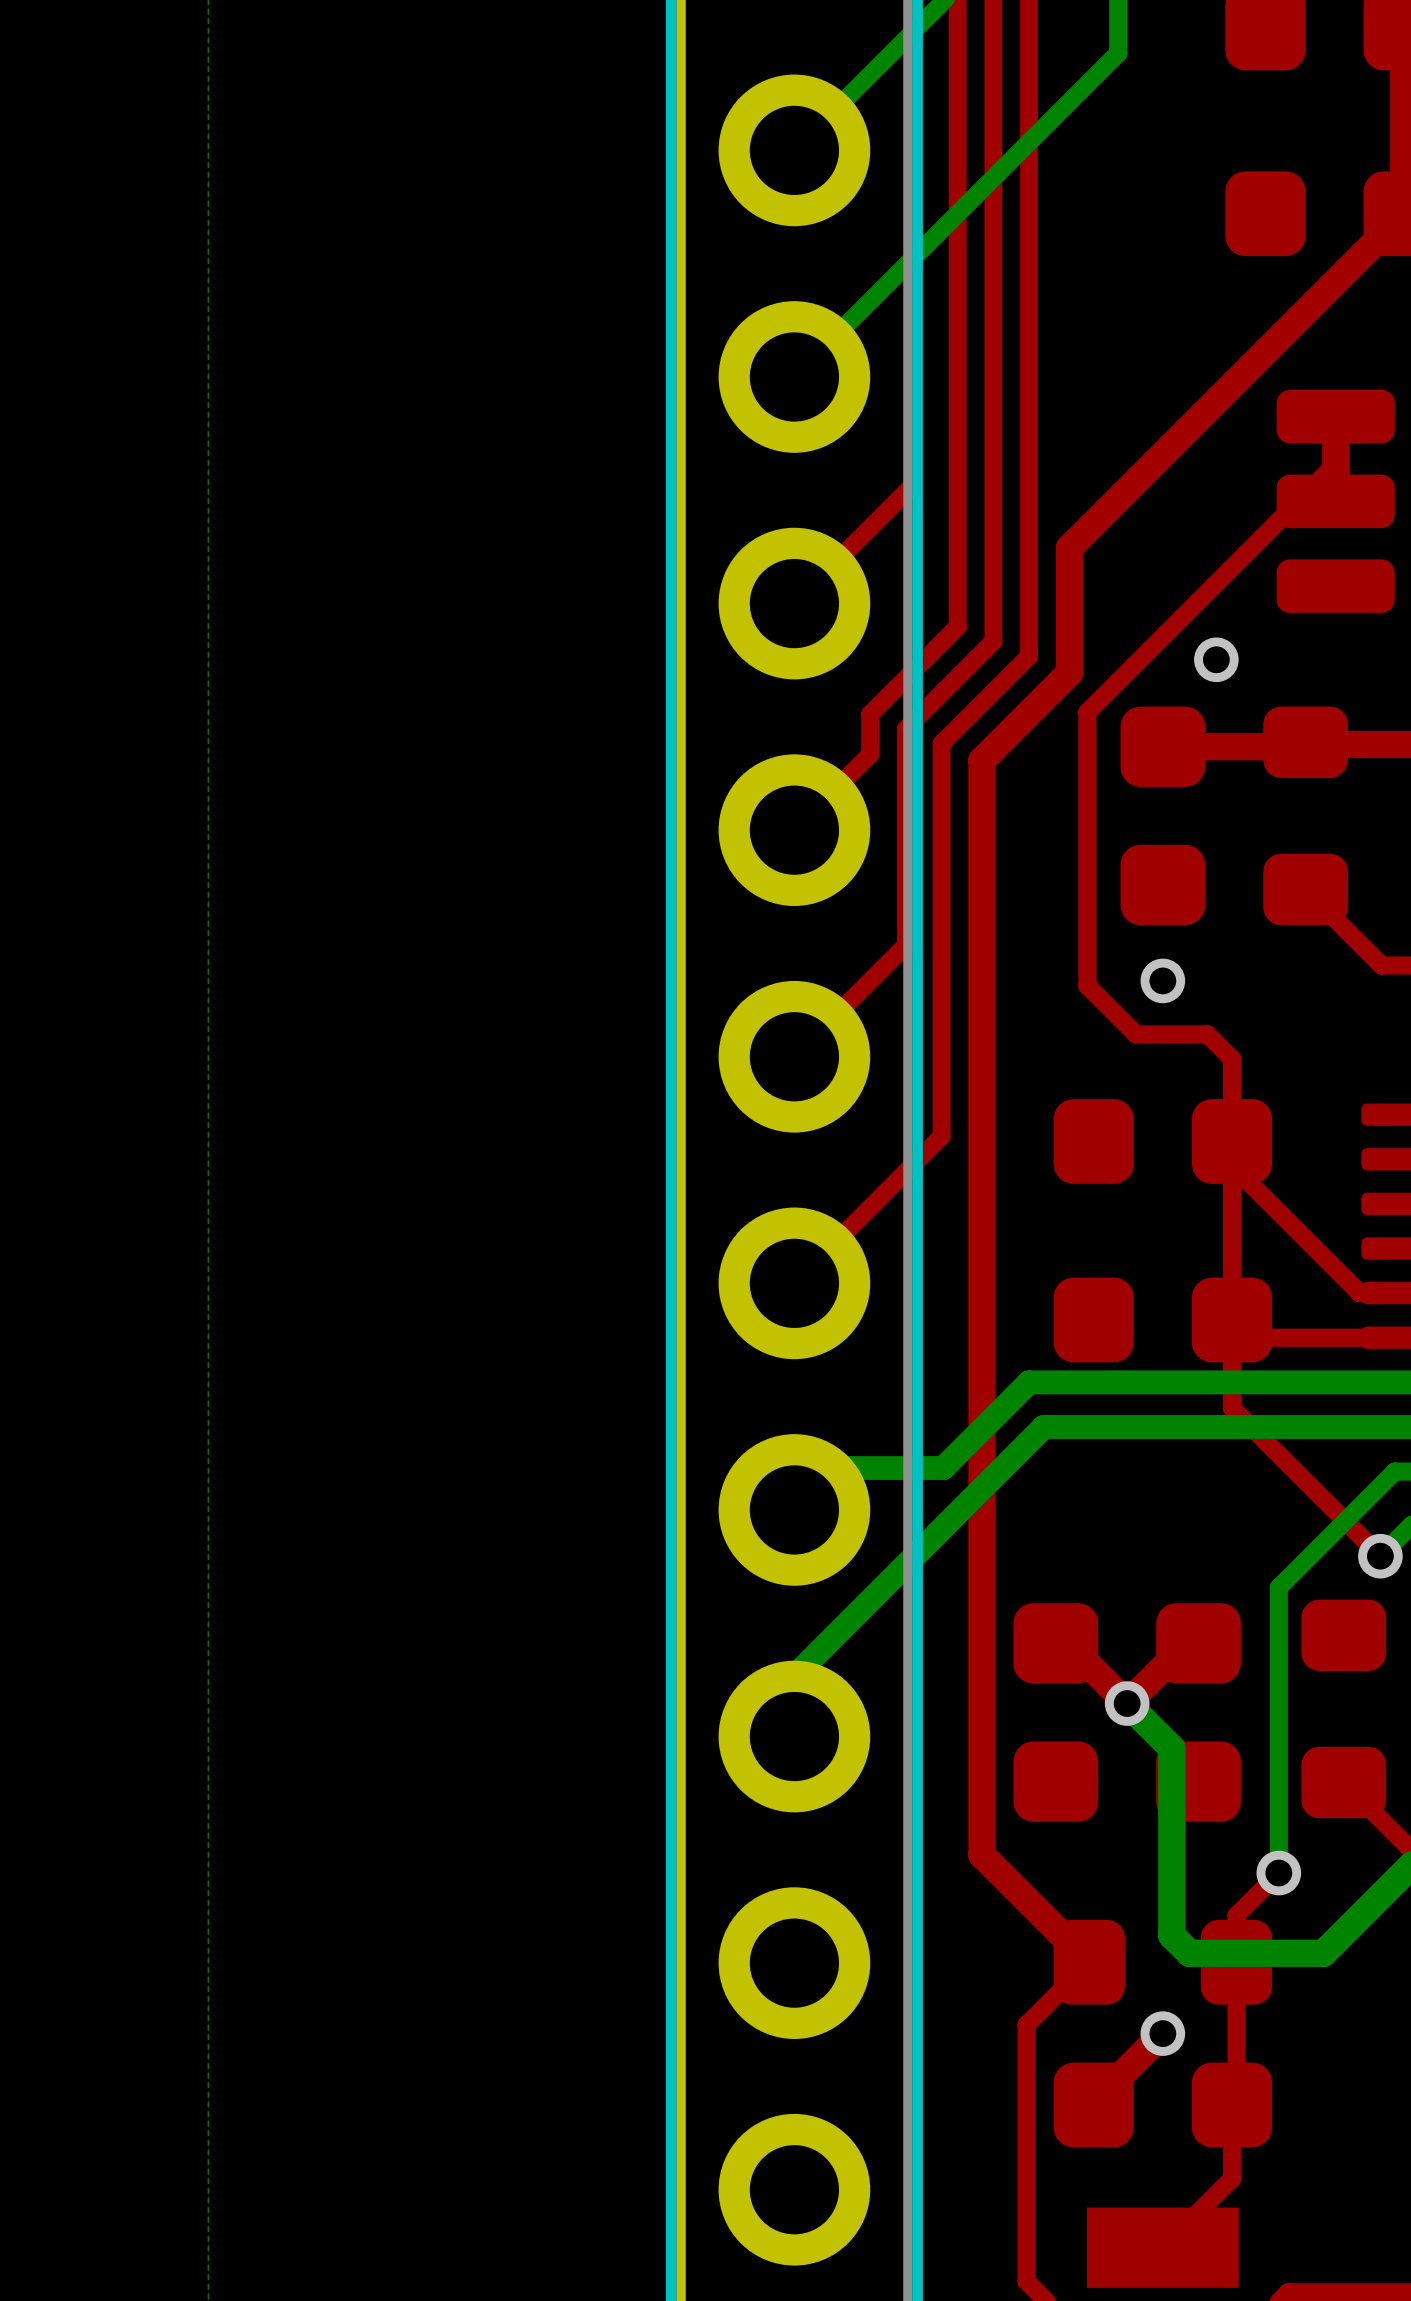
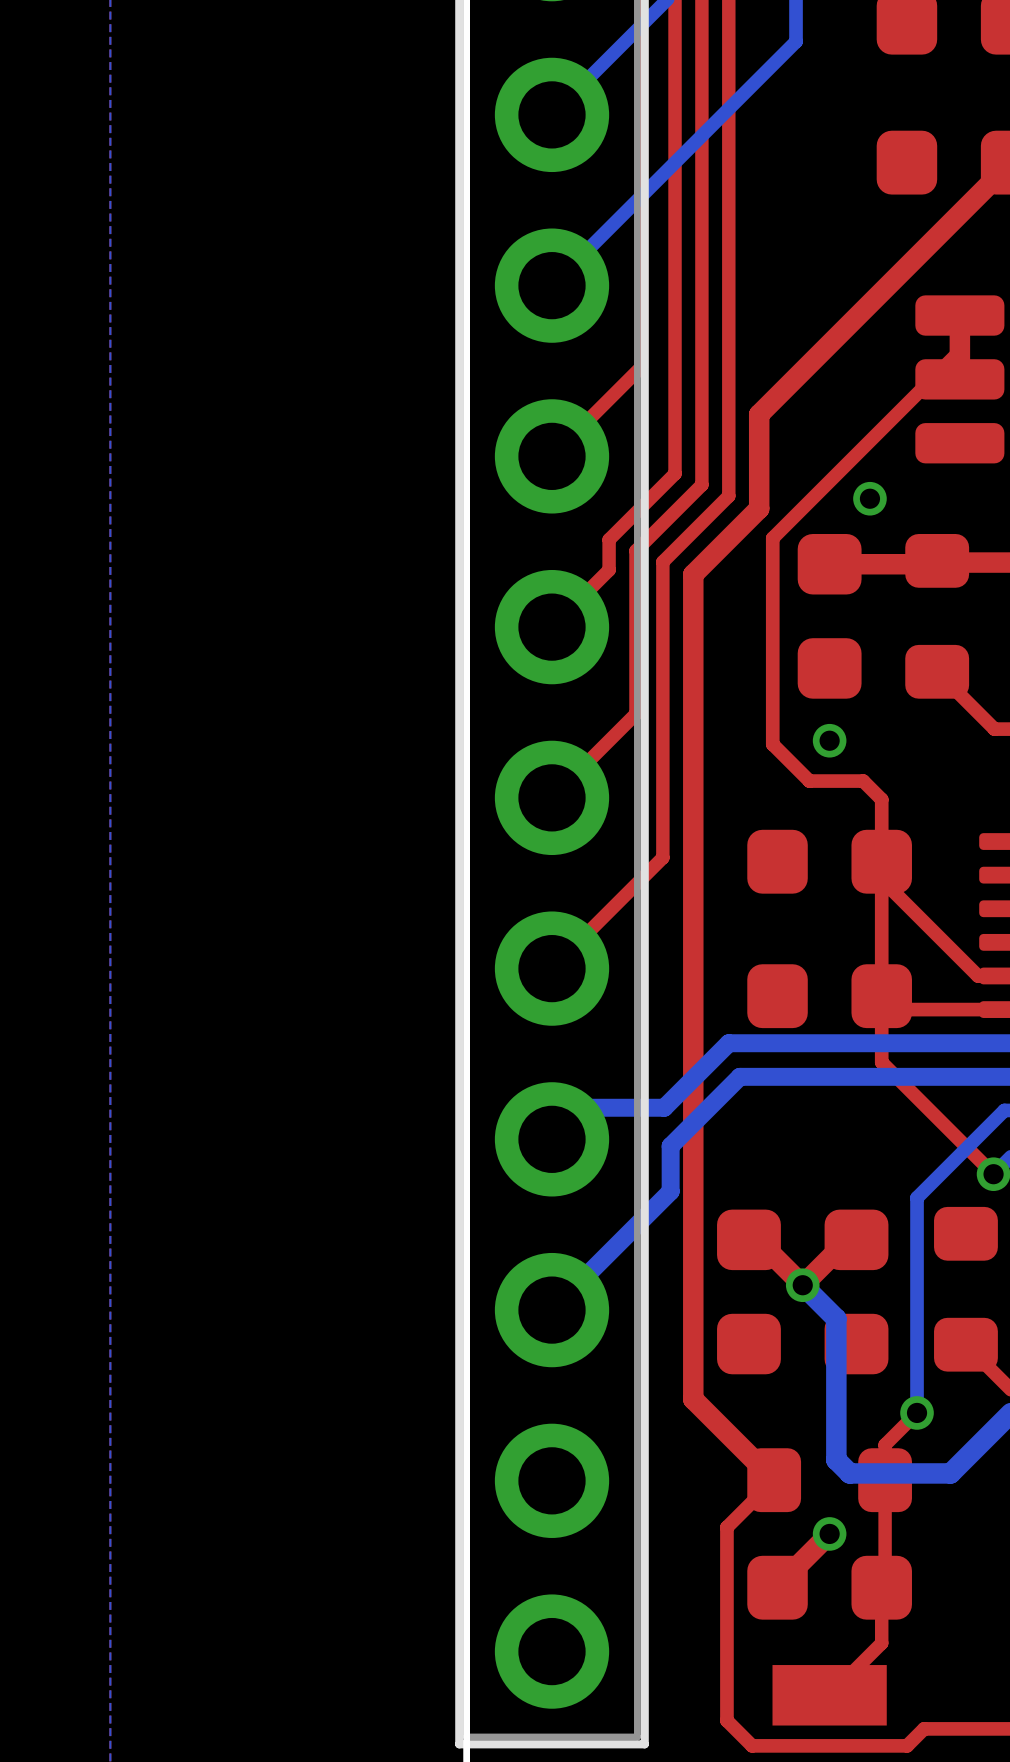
bottom track: (951, 1518) (794, 1676) (794, 1736) -> (670, 1146) (670, 1191) (552, 1310)

